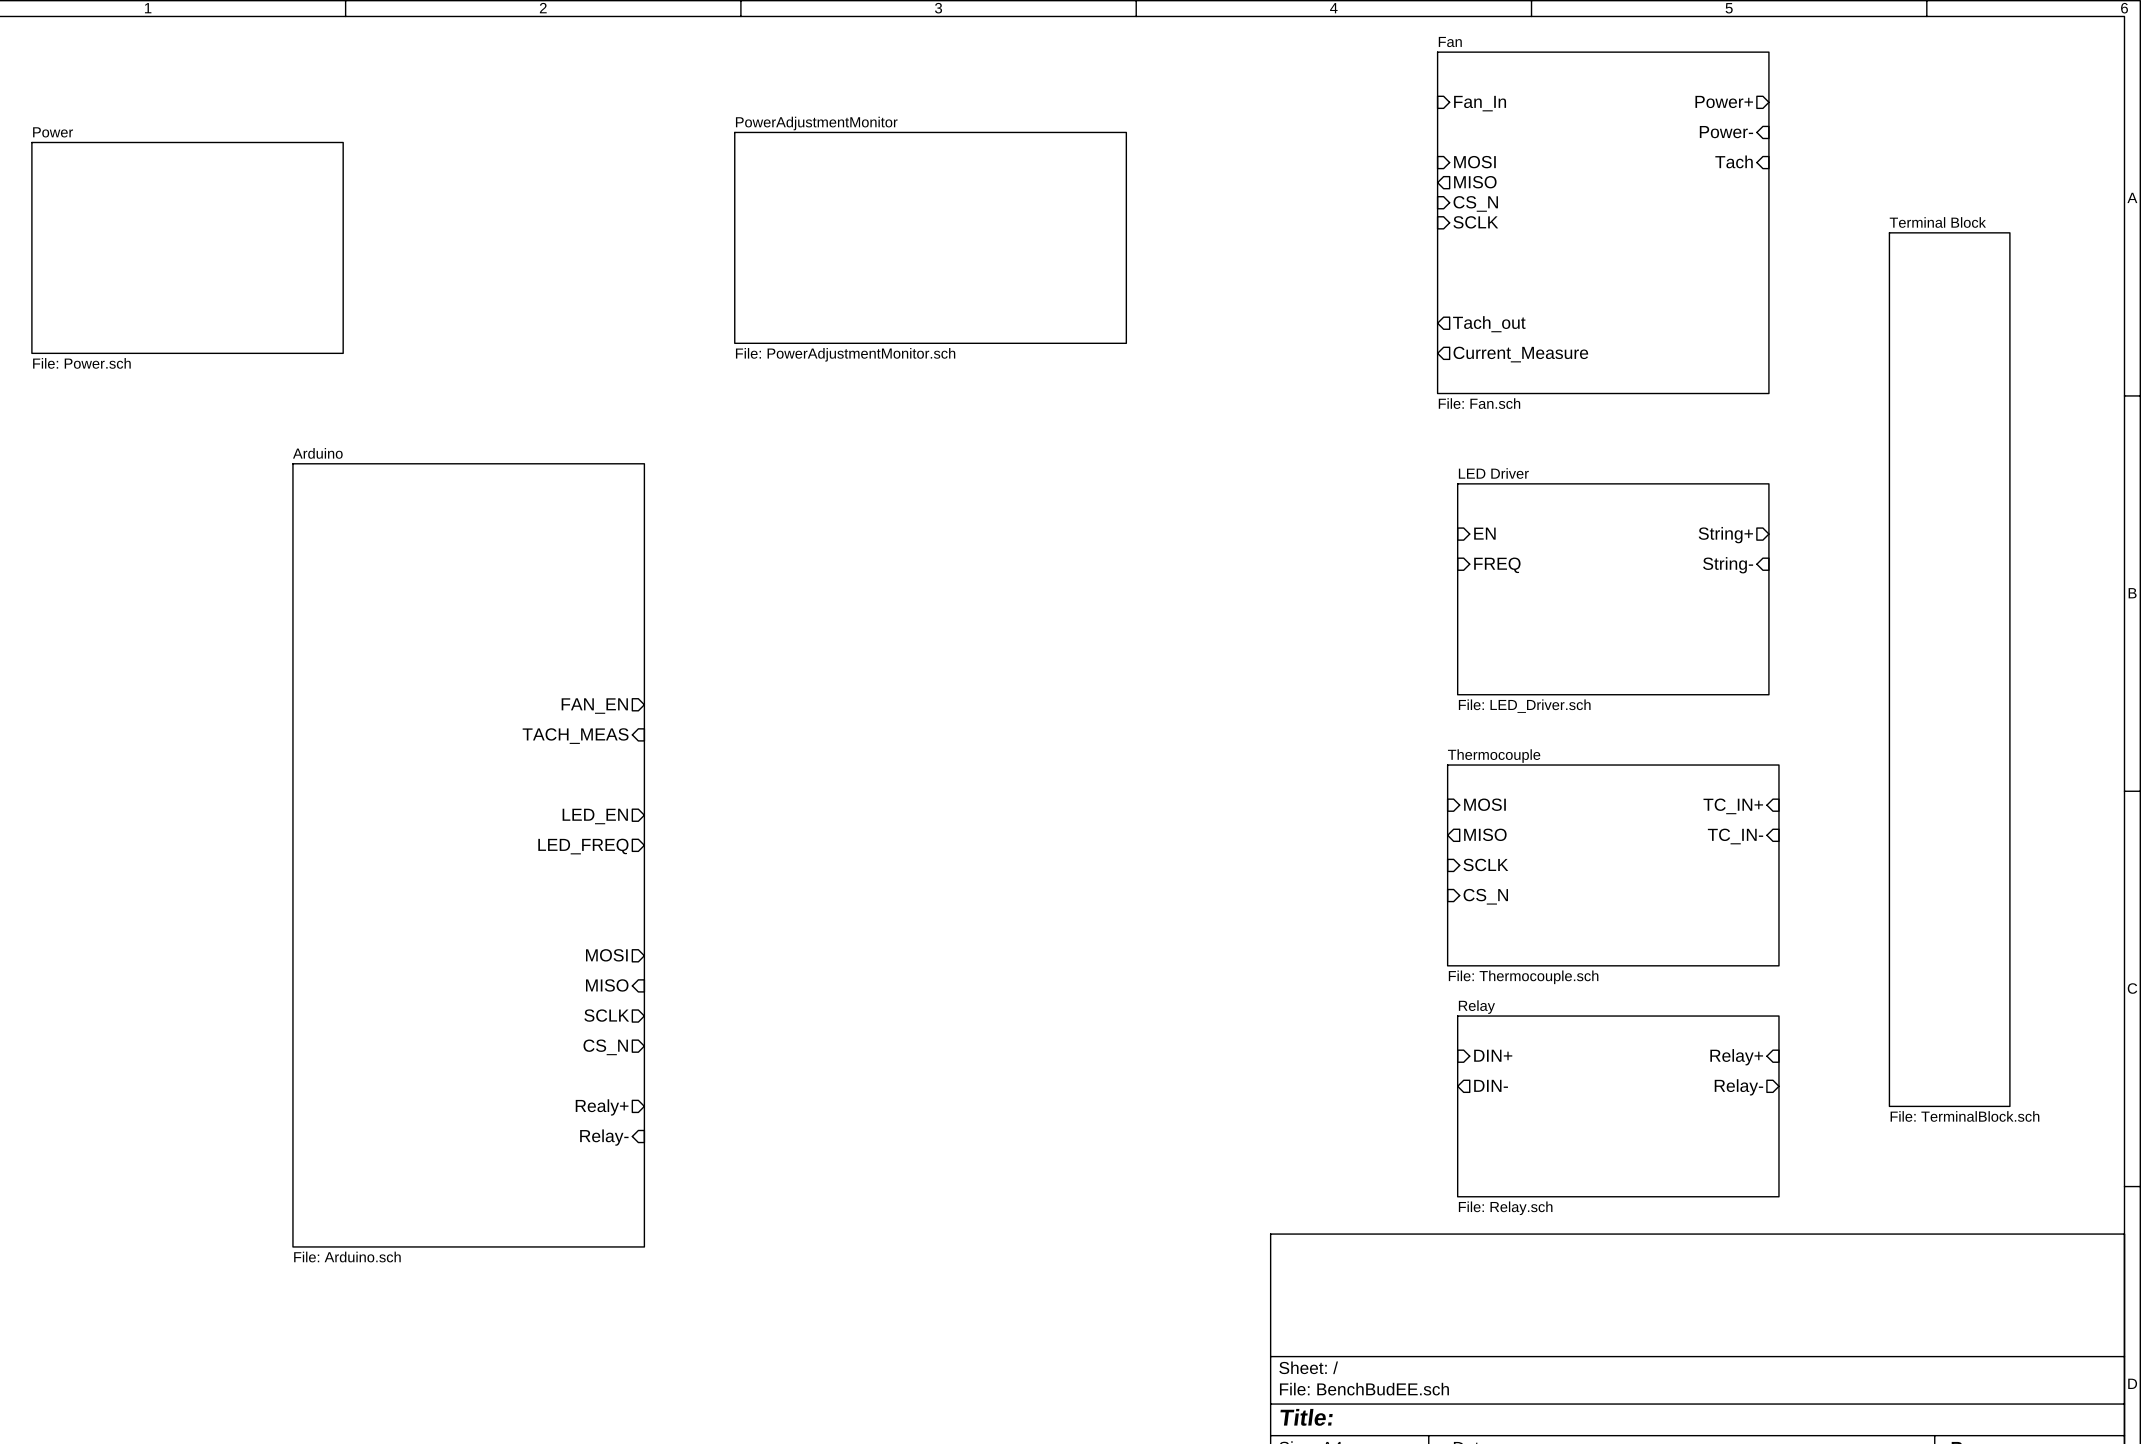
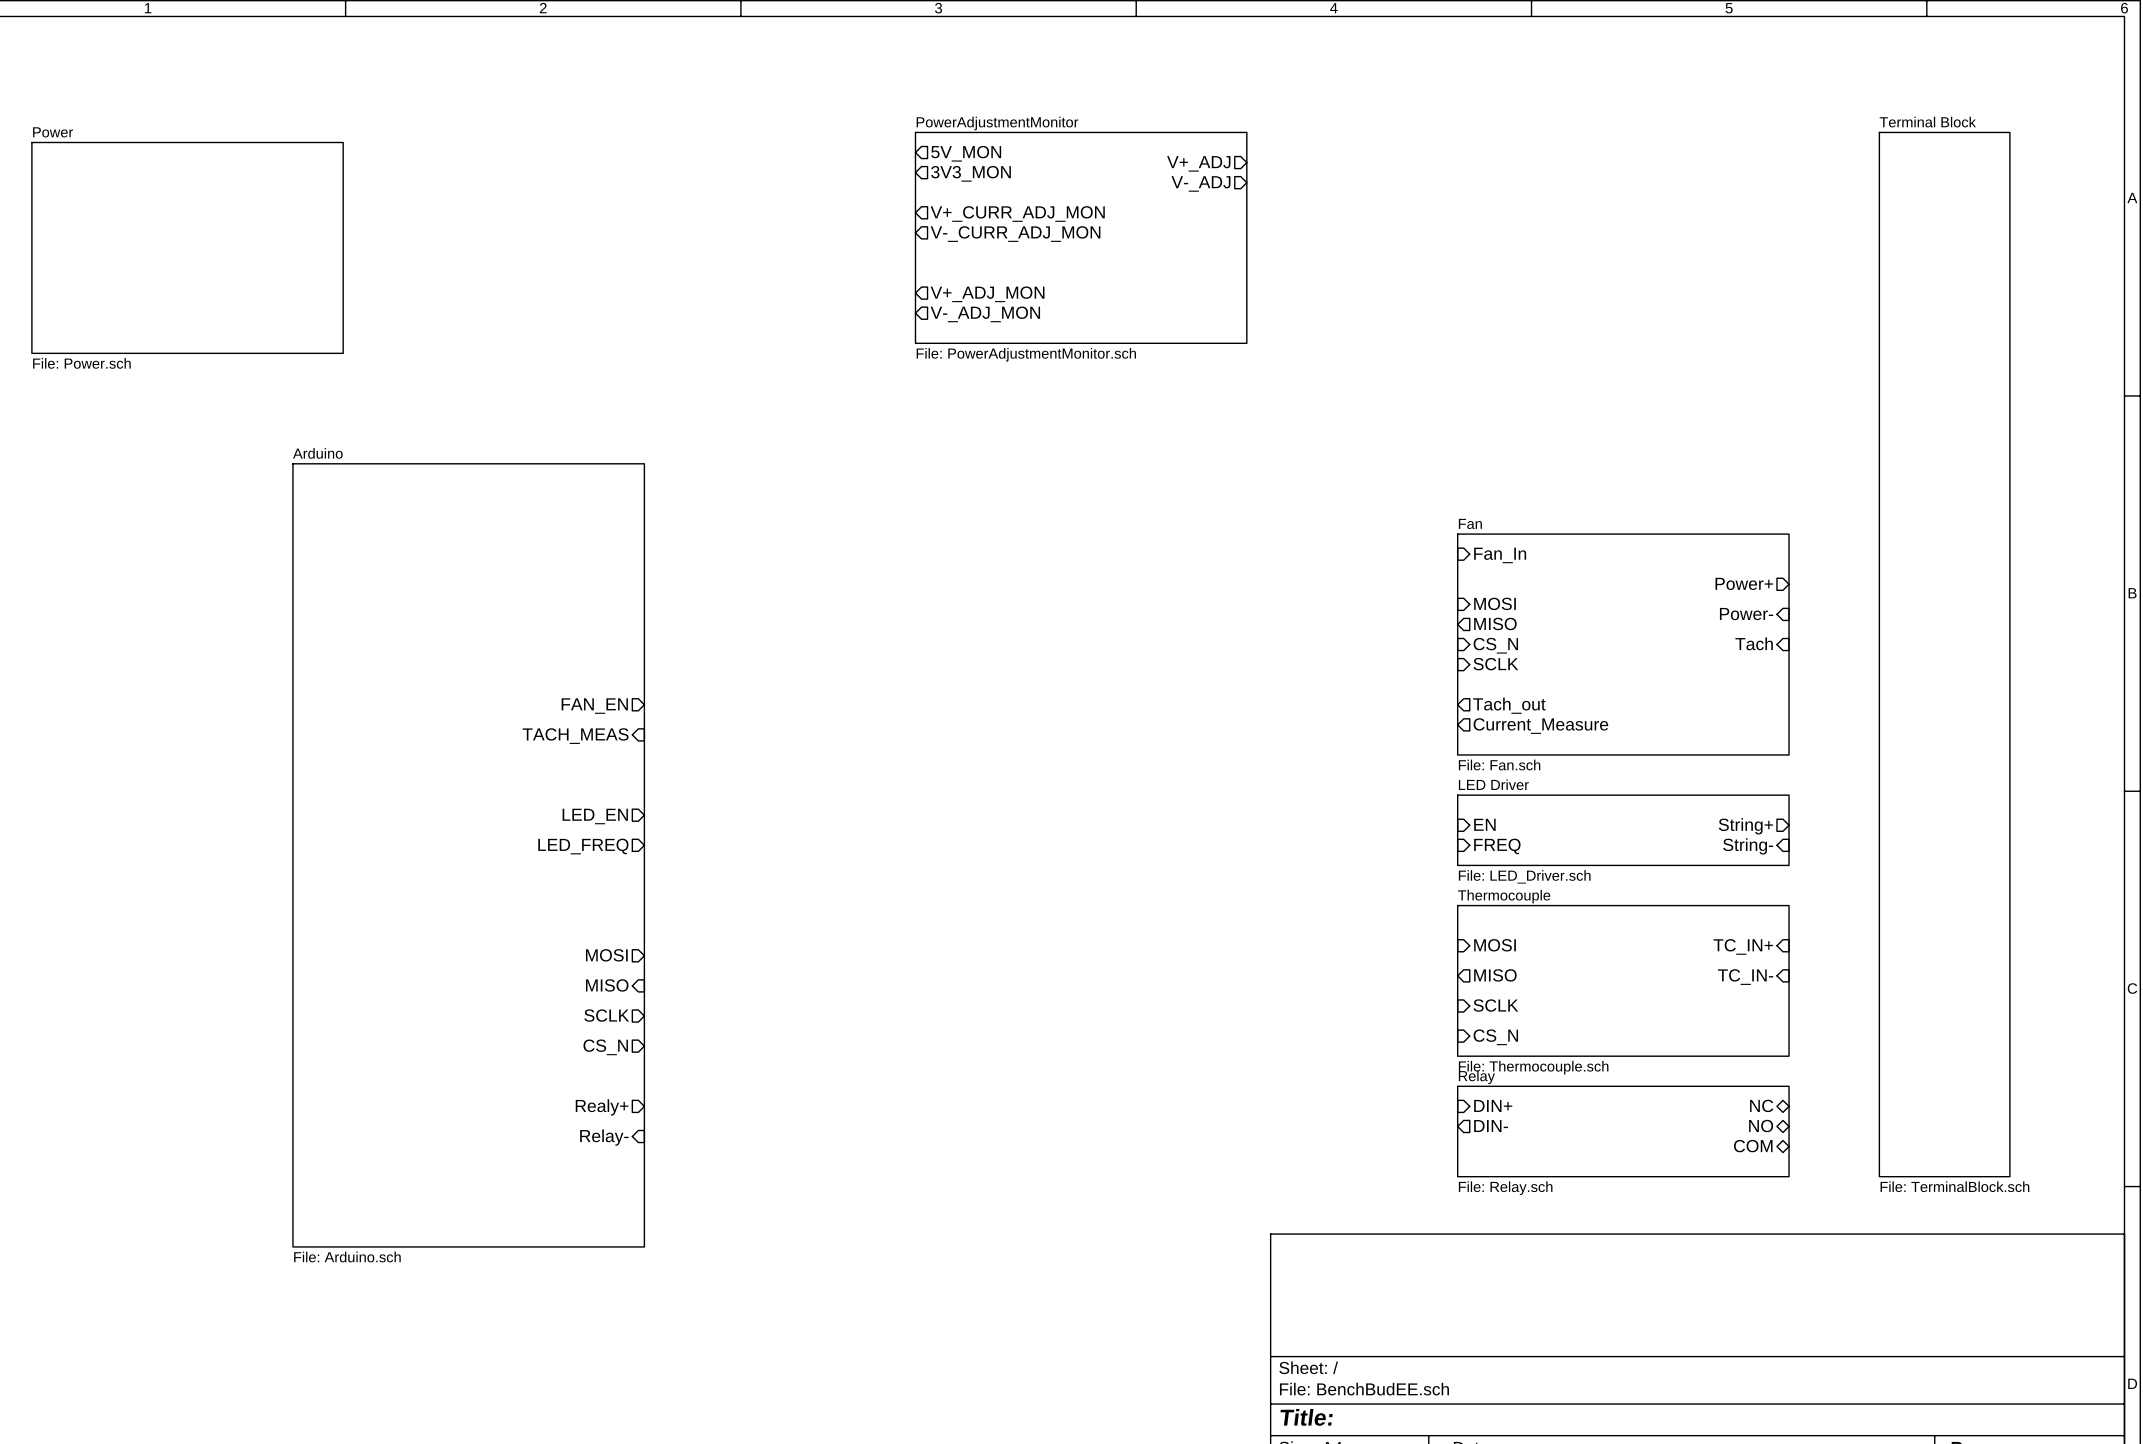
sheet pin: Power+ (1724, 101) -> none
sheet pin: Fan_In (1480, 103) -> none
sheet pin: Power- (1726, 132) -> none
sheet pin: none -> 5V_MON (966, 153)
sheet pin: Tach (1734, 161) -> none
sheet pin: MOSI (1474, 162) -> none
sheet pin: none -> V+_ADJ (1198, 163)
sheet pin: none -> 3V3_MON (971, 173)
sheet pin: MISO (1475, 182) -> none
sheet pin: none -> V-_ADJ (1200, 183)
sheet pin: CS_N (1475, 203) -> none
sheet pin: none -> V+_CURR_ADJ_MON (1017, 213)
sheet pin: SCLK (1475, 222) -> none
sheet Fan: File: Fan.sch (1603, 222) -> none
sheet pin: none -> V-_CURR_ADJ_MON (1015, 234)
sheet PowerAdjustmentMonitor: File: PowerAdjustmentMonitor.sch (930, 237) -> none
sheet PowerAdjustmentMonitor: none -> File: PowerAdjustmentMonitor.sch (1081, 237)
sheet pin: none -> V+_ADJ_MON (987, 294)
sheet pin: none -> V-_ADJ_MON (985, 314)
sheet pin: Tach_out (1489, 324) -> none
sheet pin: Current_Measure (1520, 354) -> none
sheet pin: EN (1484, 533) -> none
sheet pin: String+ (1725, 535) -> none
sheet pin: none -> Fan_In (1500, 555)
sheet pin: FREQ (1497, 565) -> none
sheet pin: String- (1728, 565) -> none
sheet pin: none -> Power+ (1744, 583)
sheet LED Driver: File: LED_Driver.sch (1613, 589) -> none
sheet pin: none -> MOSI (1495, 603)
sheet pin: none -> Power- (1746, 614)
sheet pin: none -> MISO (1495, 623)
sheet pin: none -> Tach (1754, 643)
sheet Fan: none -> File: Fan.sch (1623, 644)
sheet pin: none -> CS_N (1495, 645)
sheet Terminal Block: none -> File: TerminalBlock.sch (1944, 654)
sheet pin: none -> SCLK (1495, 664)
sheet Terminal Block: File: TerminalBlock.sch (1949, 669) -> none
sheet pin: none -> Tach_out (1509, 705)
sheet pin: none -> Current_Measure (1540, 726)
sheet pin: MOSI (1484, 804) -> none
sheet pin position: TC_IN+ (1733, 806) -> TC_IN+ (1743, 946)
sheet pin: none -> EN (1484, 824)
sheet pin: none -> String+ (1745, 826)
sheet LED Driver: none -> File: LED_Driver.sch (1623, 830)
sheet pin: MISO (1485, 834) -> none
sheet pin position: TC_IN- (1735, 836) -> TC_IN- (1745, 977)
sheet pin: none -> FREQ (1497, 846)
sheet pin: none -> String- (1748, 846)
sheet pin: SCLK (1485, 864) -> none
sheet Thermocouple: File: Thermocouple.sch (1613, 865) -> none
sheet pin: CS_N (1485, 896) -> none
sheet pin: none -> MOSI (1495, 945)
sheet pin: none -> MISO (1495, 975)
sheet Thermocouple: none -> File: Thermocouple.sch (1623, 980)
sheet pin: none -> SCLK (1495, 1005)
sheet pin: none -> CS_N (1495, 1037)
sheet pin position: DIN+ (1493, 1055) -> DIN+ (1493, 1105)
sheet pin: Relay+ (1736, 1057) -> none
sheet pin position: DIN- (1491, 1085) -> DIN- (1491, 1126)
sheet pin: Relay- (1738, 1087) -> none
sheet pin: none -> NC (1761, 1105)
sheet Relay: File: Relay.sch (1618, 1106) -> none
sheet pin: none -> NO (1761, 1126)
sheet Relay: none -> File: Relay.sch (1623, 1131)
sheet pin: none -> COM (1753, 1146)

